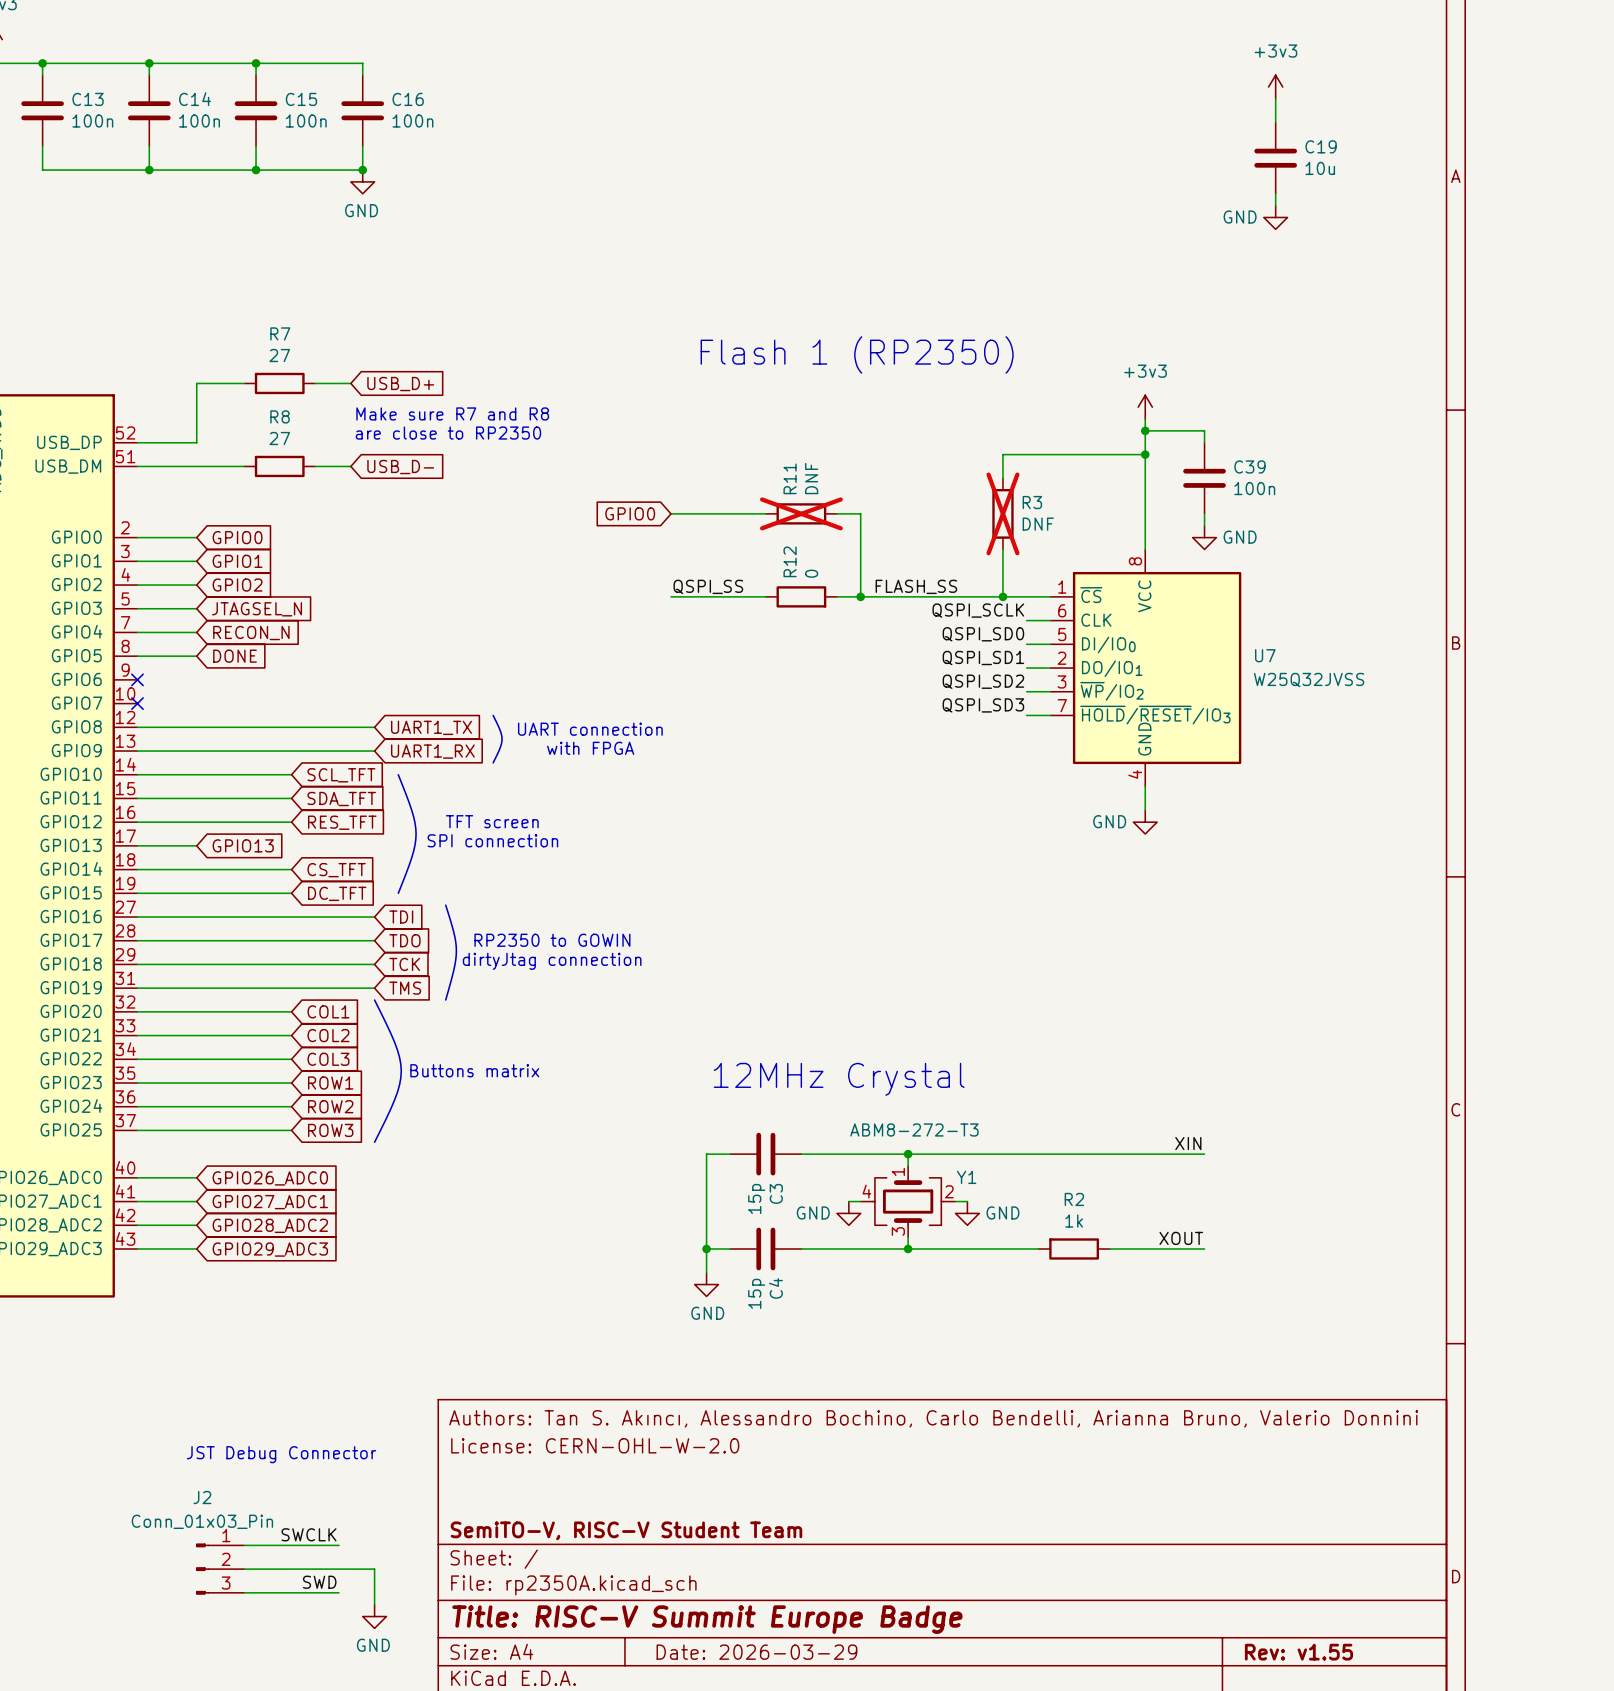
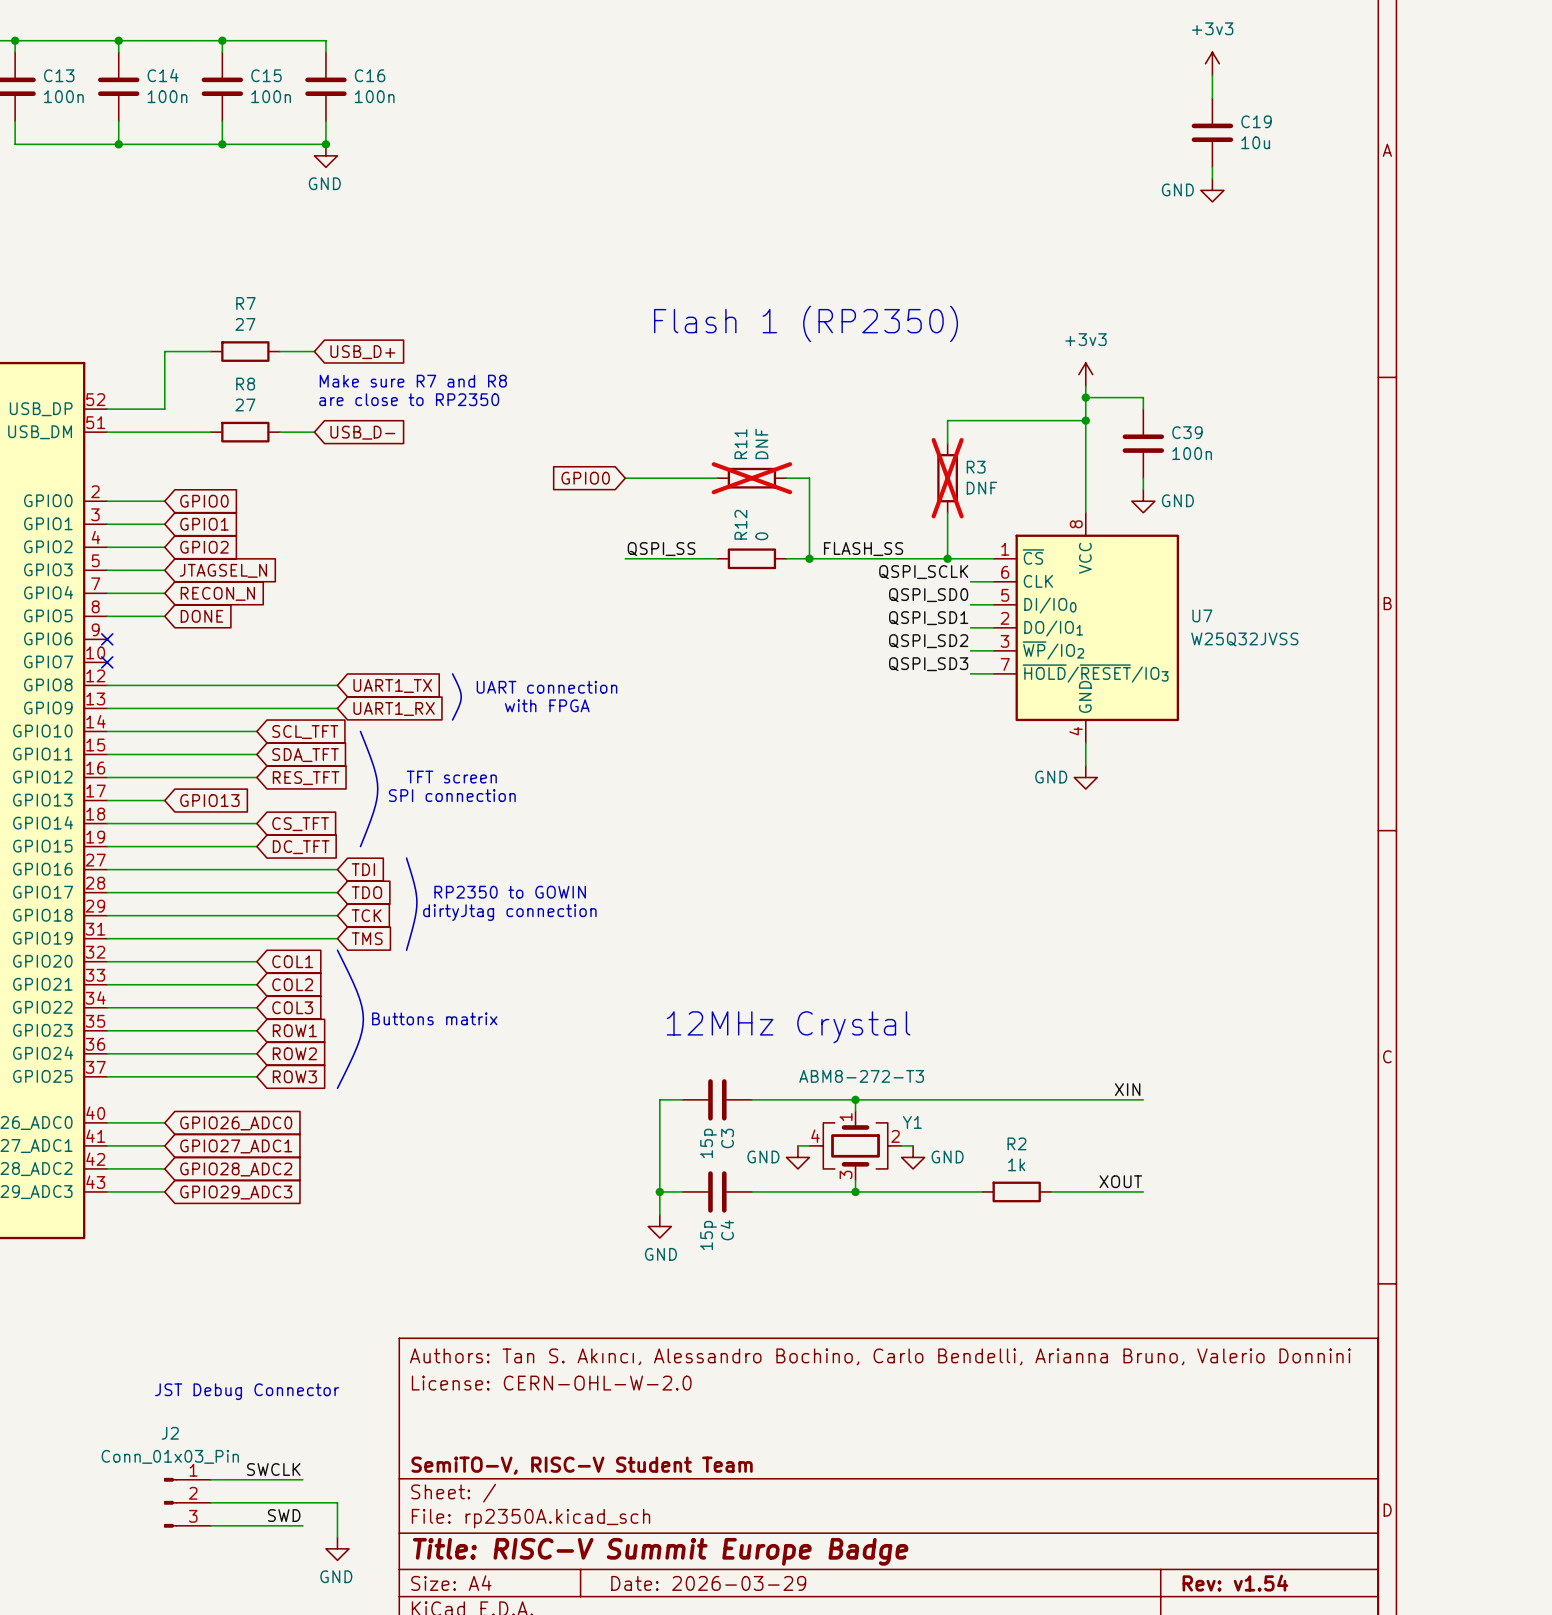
title block: Rev: v1.55 (1298, 1652) -> Rev: v1.54 (1235, 1583)

